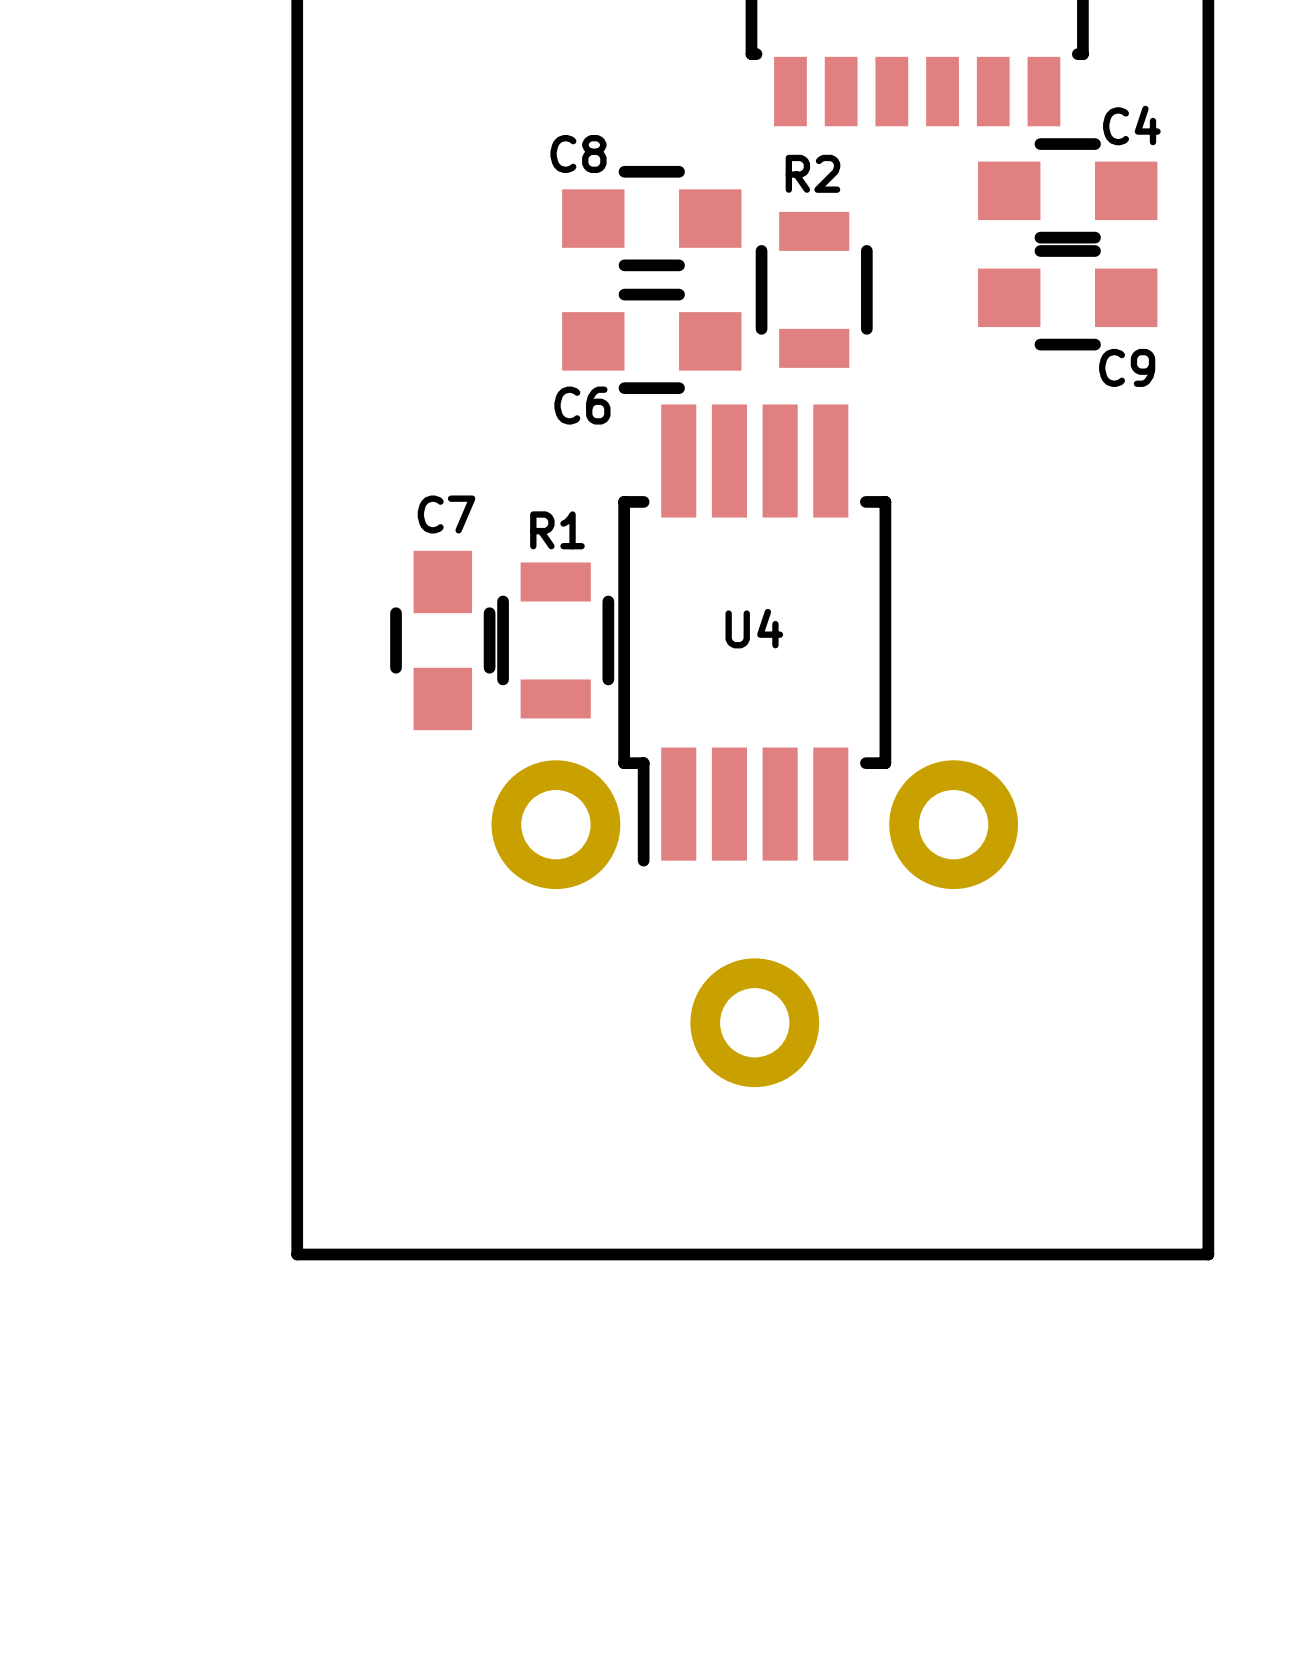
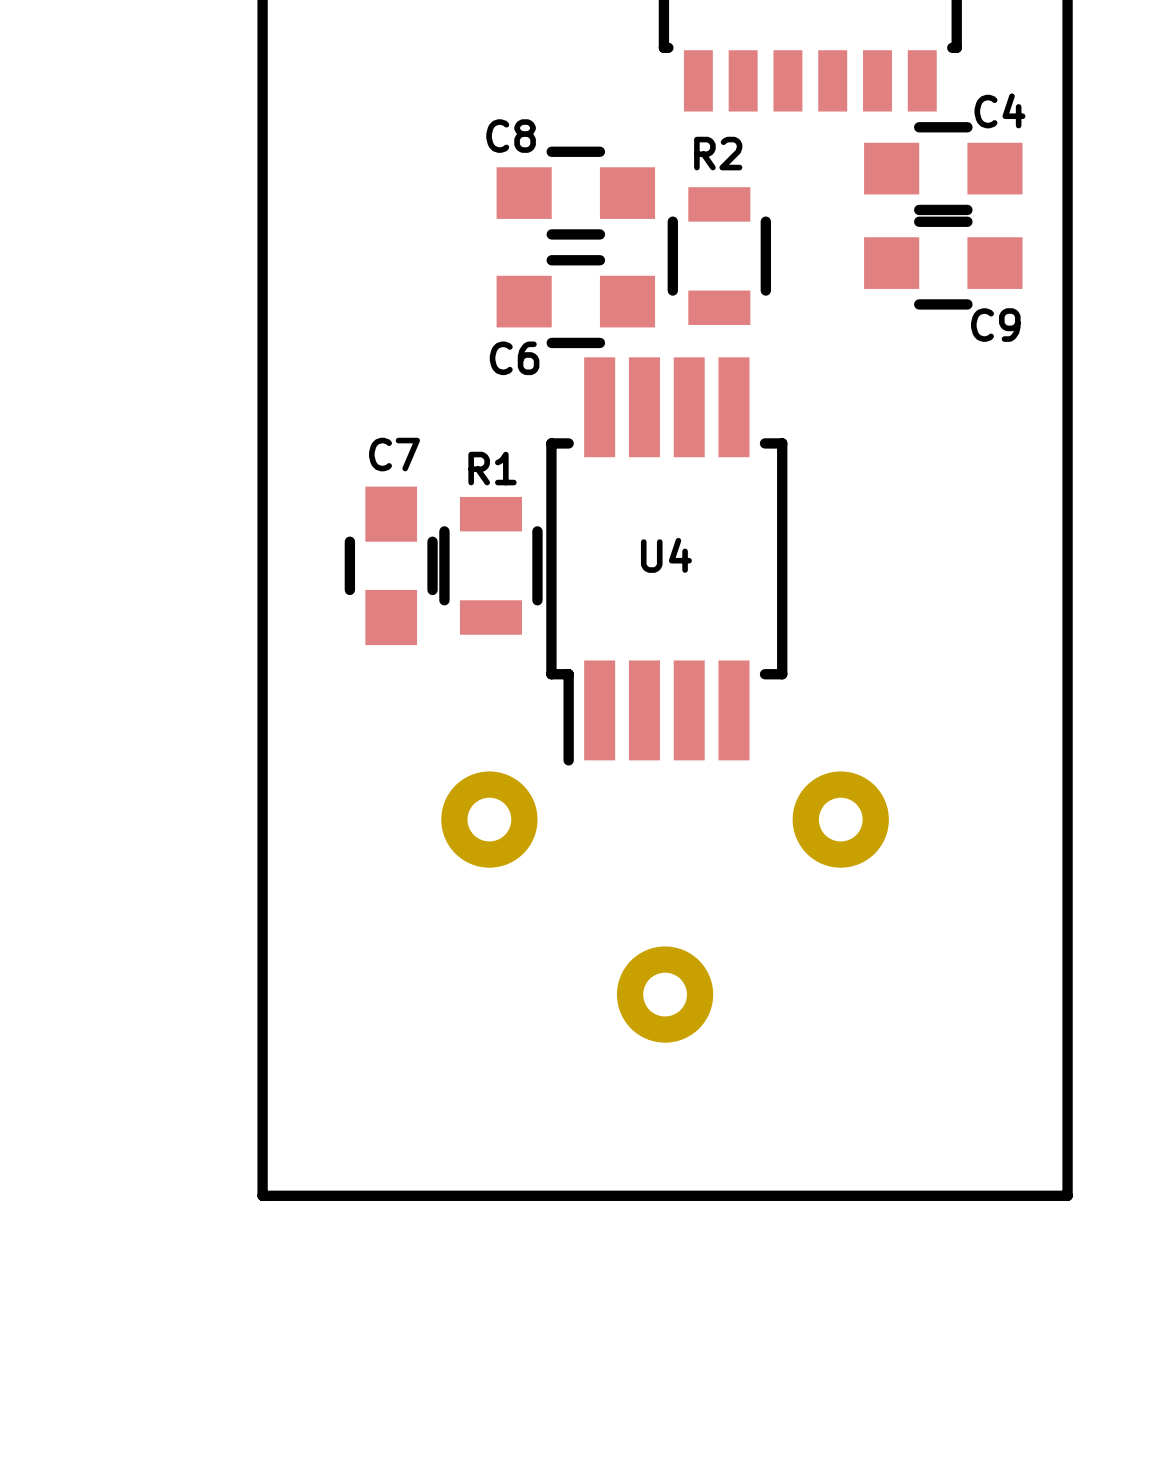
part: (754, 923) -> none
part: none -> (665, 907)
board edge: (297, 1254) (1208, 1254) -> (262, 1108) (262, 1195) (1067, 1195) (1067, 1108)

